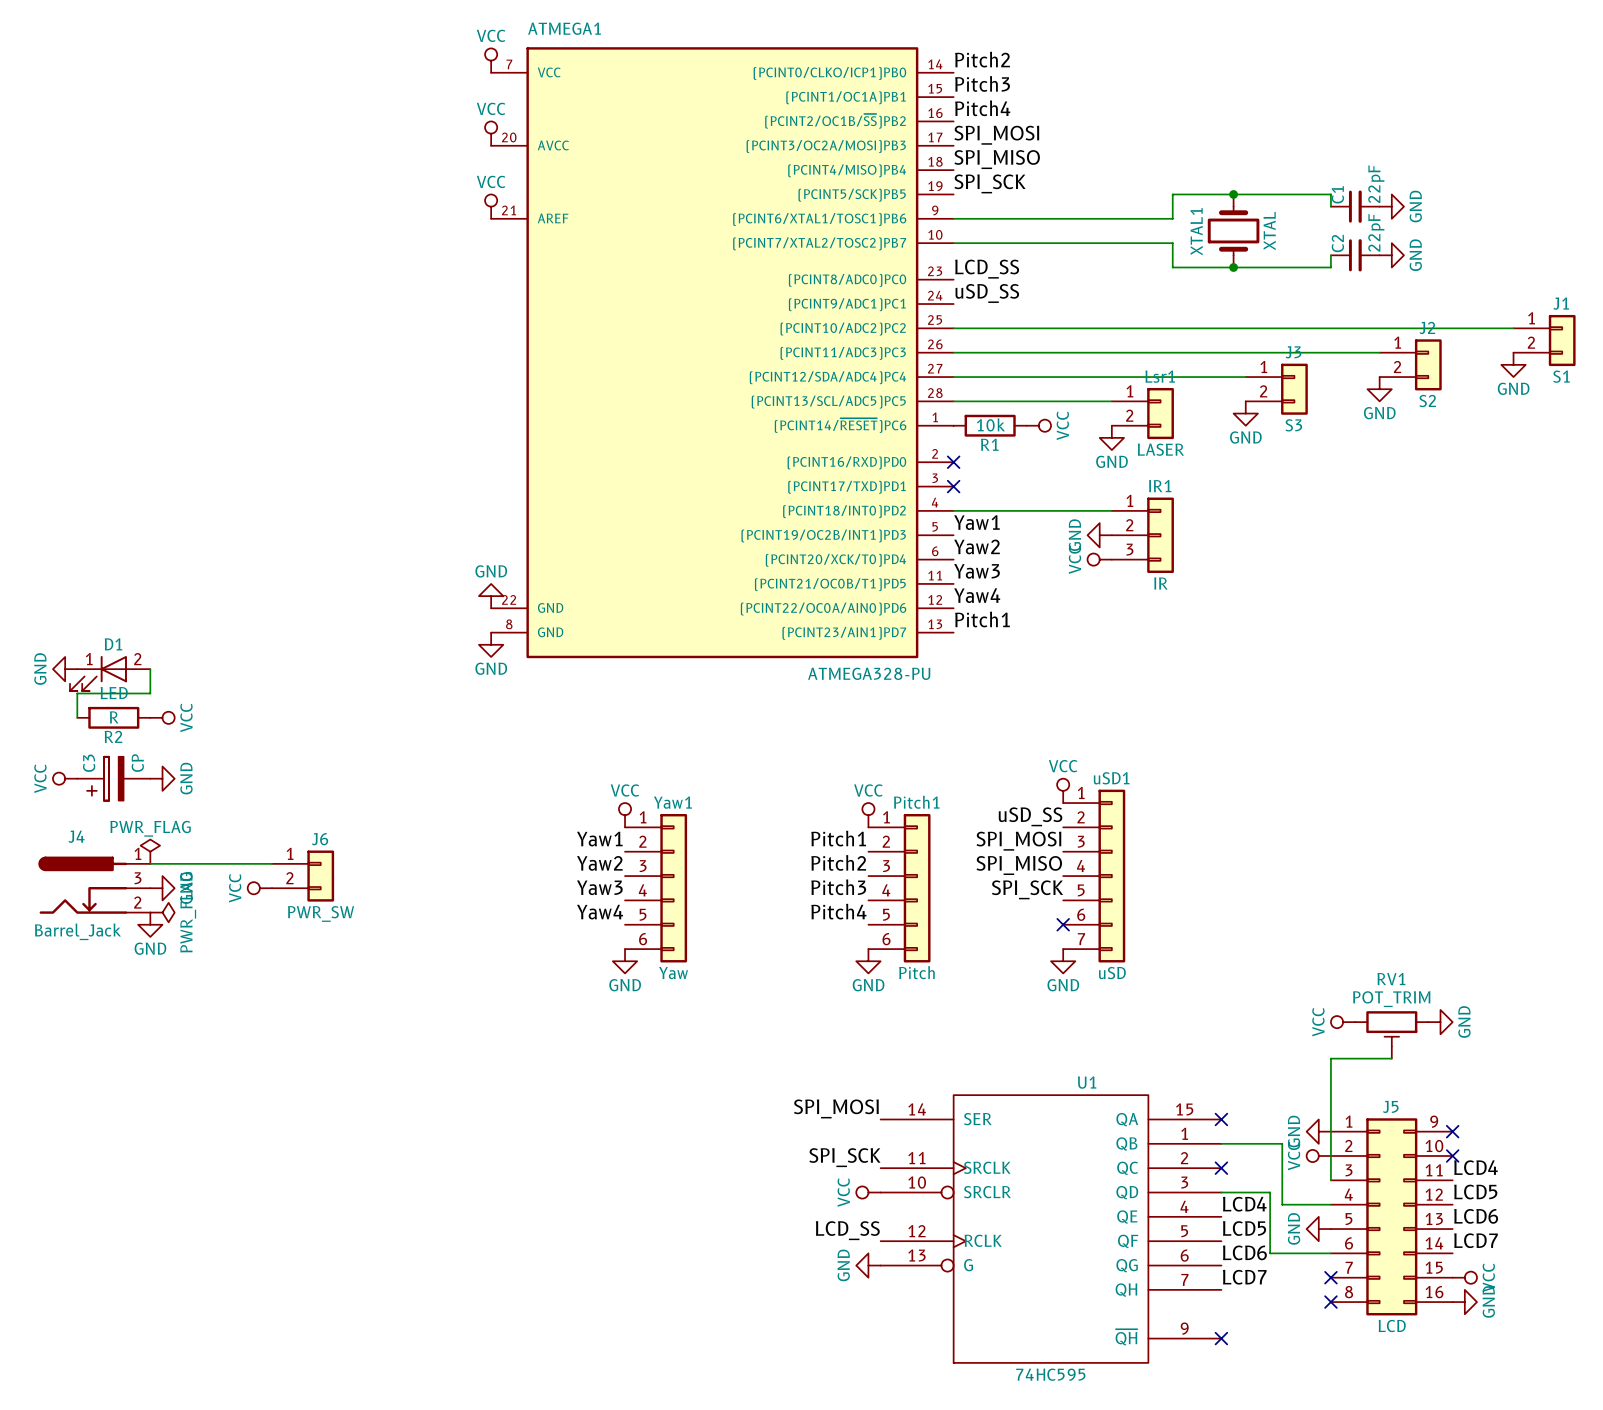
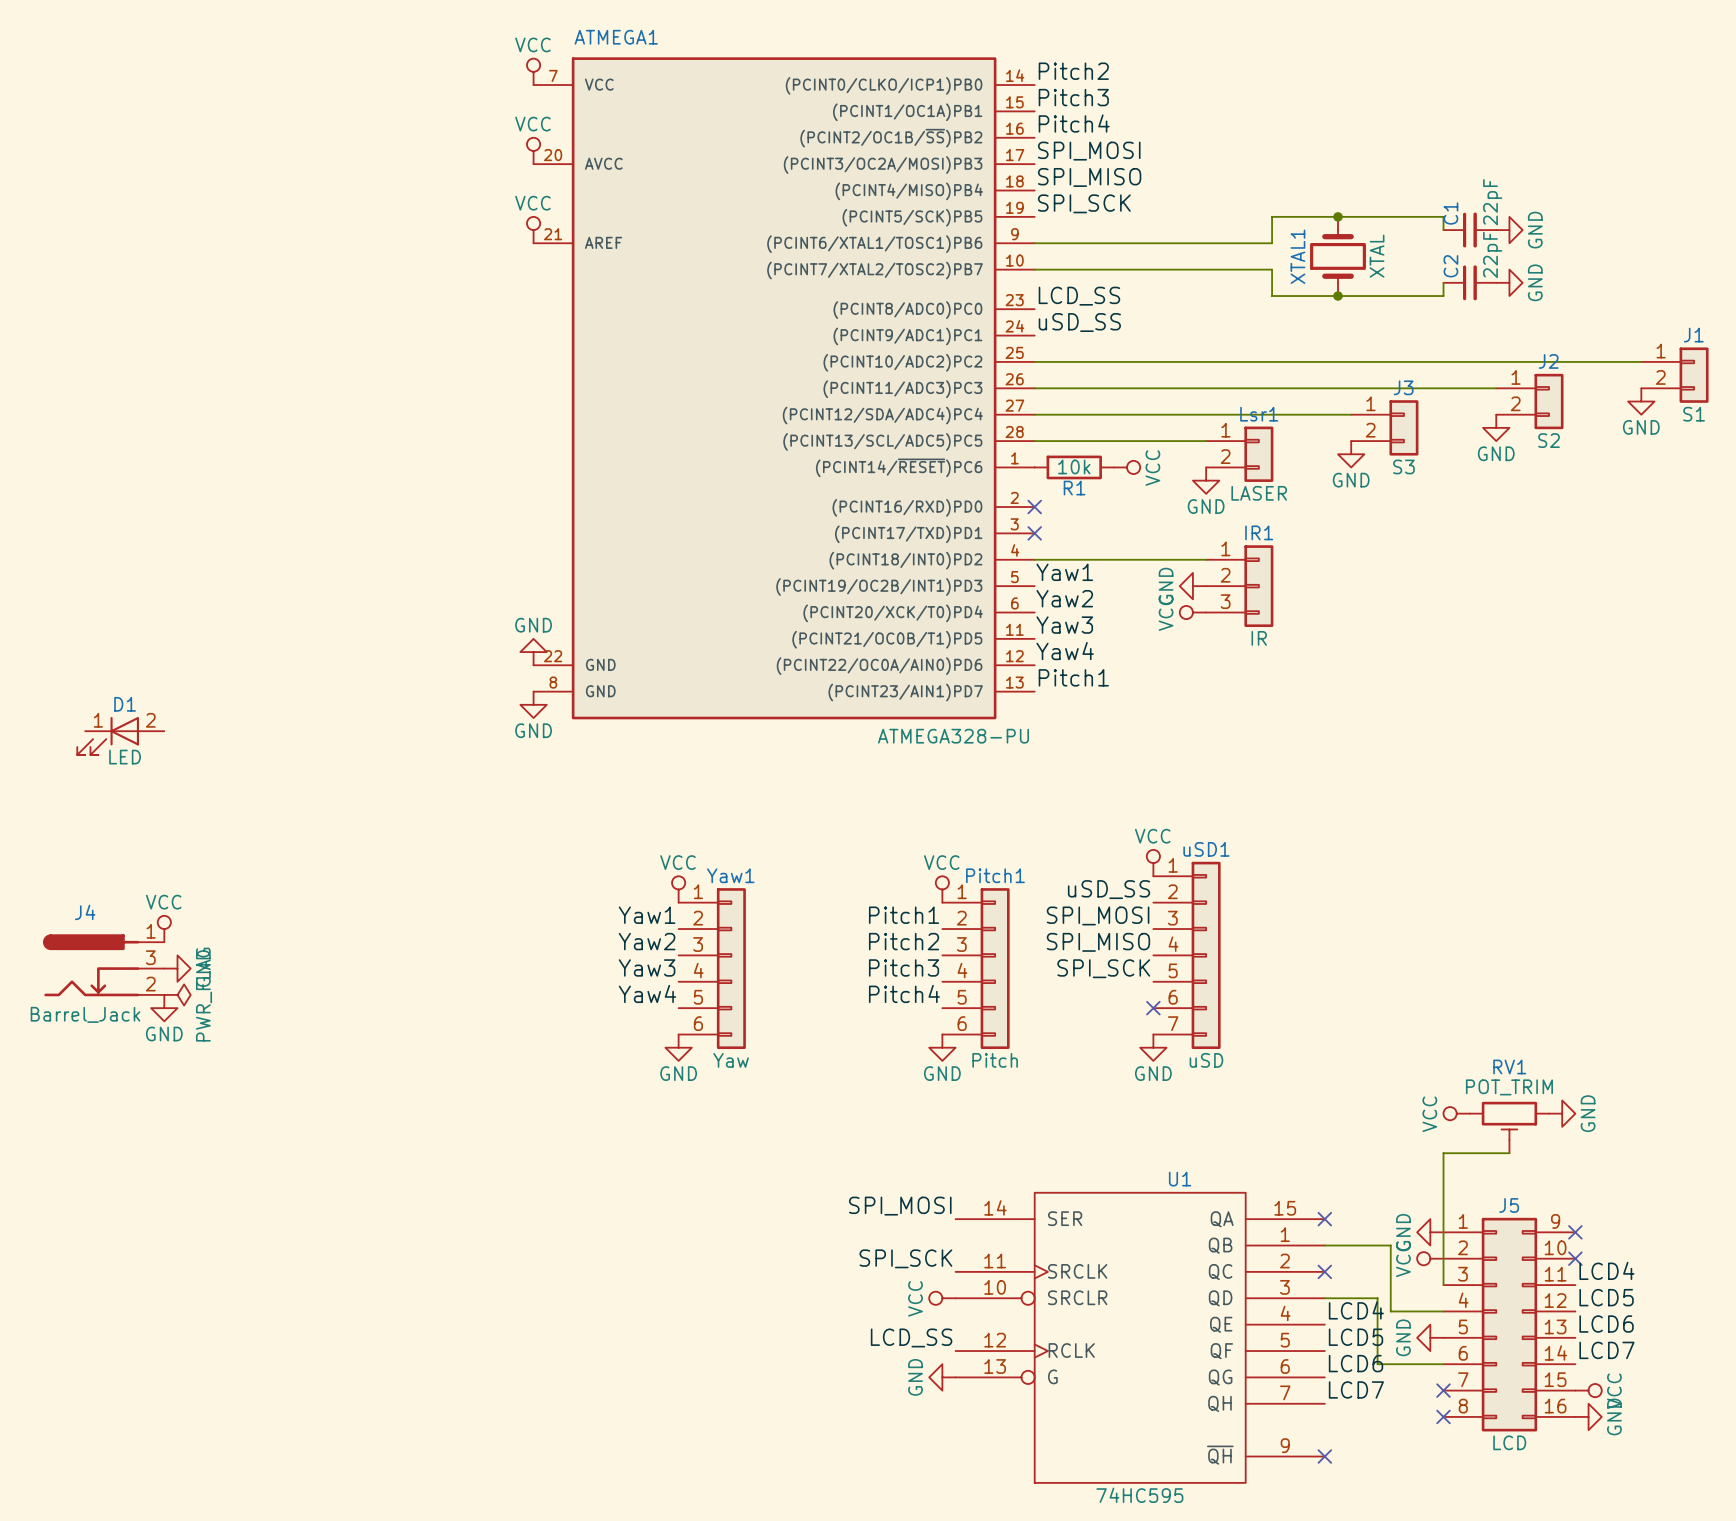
power symbol: GND (65, 669) -> none
wire: (150, 669) (150, 693) (77, 693) (77, 717) -> none
R2: R (113, 717) -> none
power symbol: VCC (162, 717) -> none
power symbol: VCC (65, 778) -> none
C3: CP (113, 778) -> none
power symbol: GND (162, 778) -> none
power symbol: PWR_FLAG (150, 851) -> VCC (164, 929)
wire: (150, 863) (272, 863) -> none
J6: PWR_SW (303, 876) -> none
power symbol: VCC (259, 888) -> none

